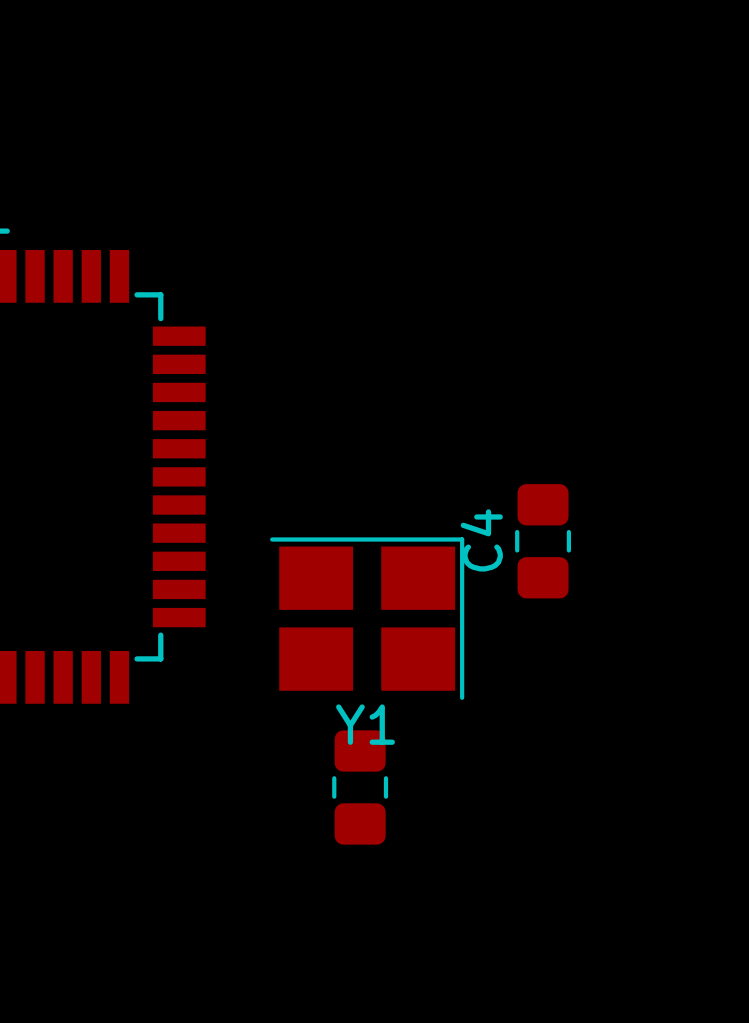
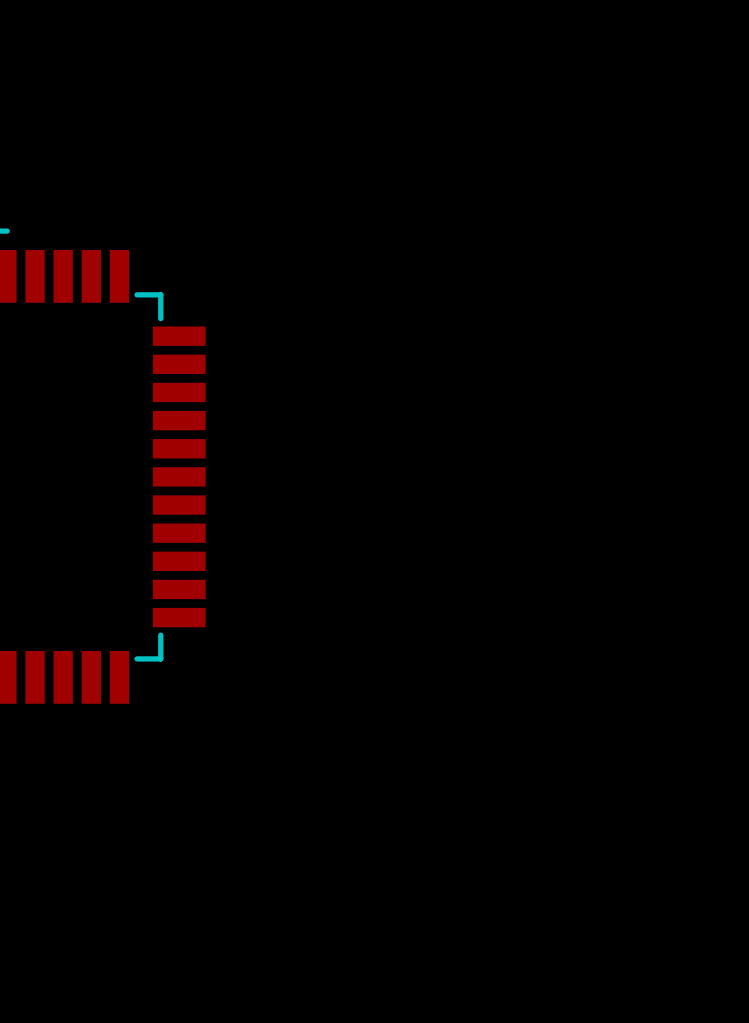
C4: (543, 541) -> none
Y1: (367, 618) -> none
part: (360, 787) -> none

